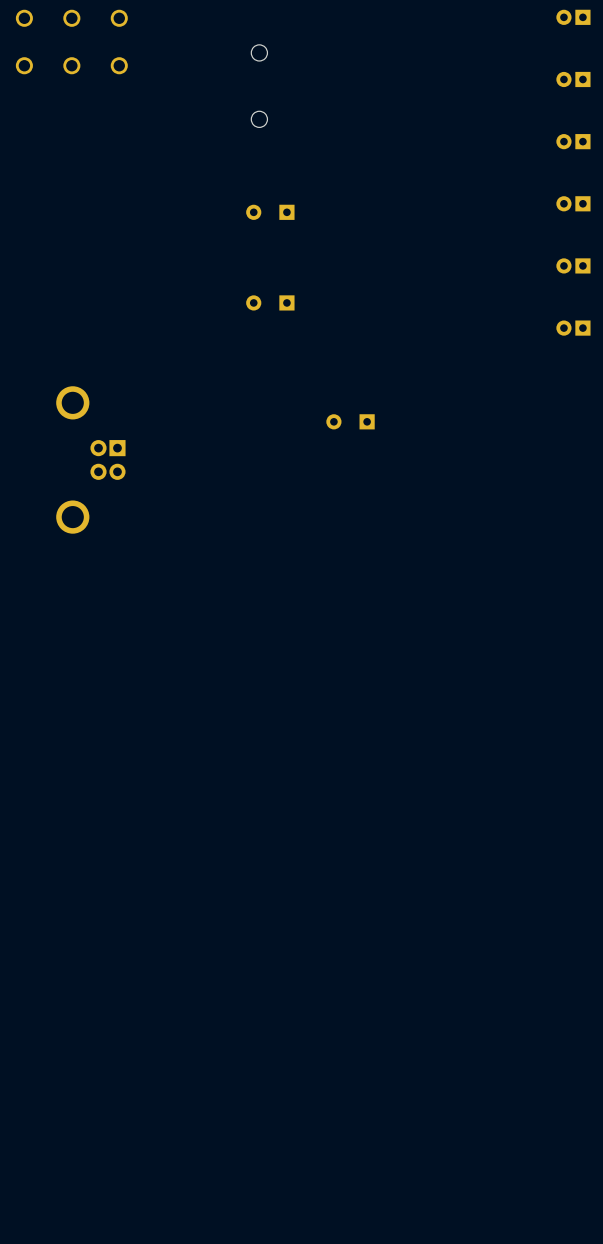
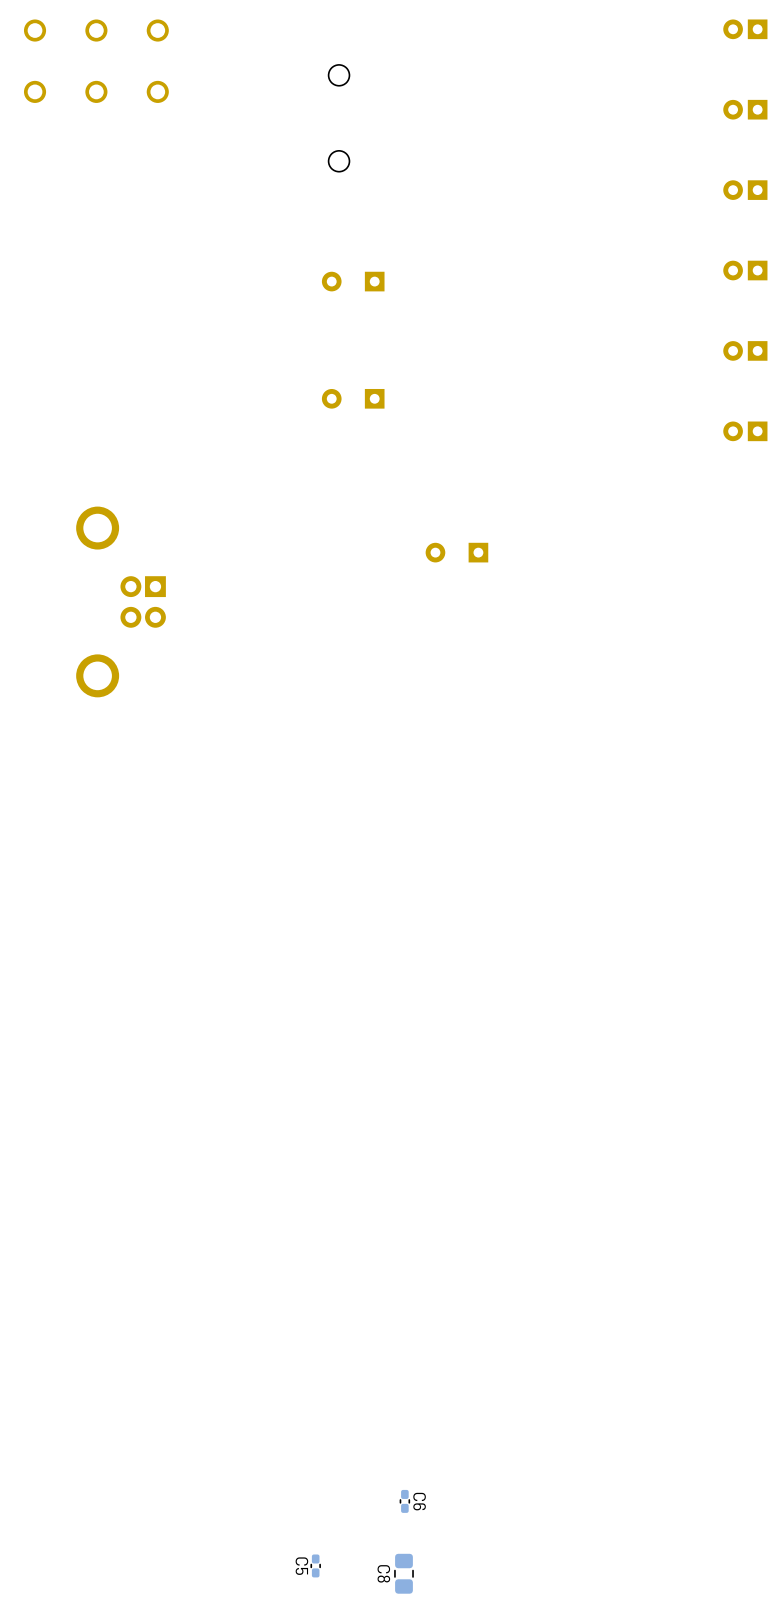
C6: none -> (404, 1501)
C5: none -> (315, 1565)
C8: none -> (403, 1573)

